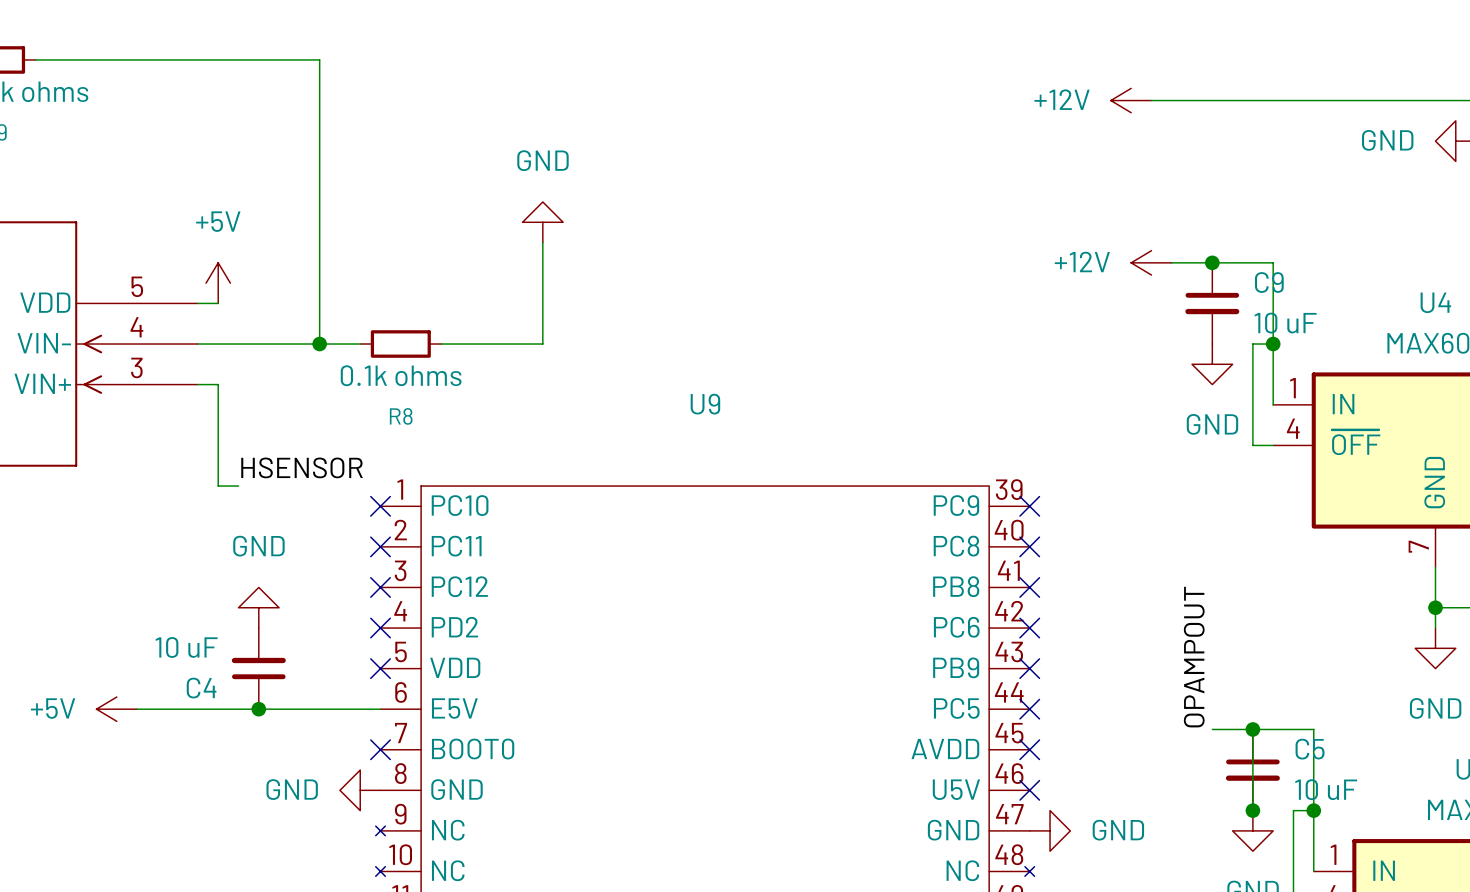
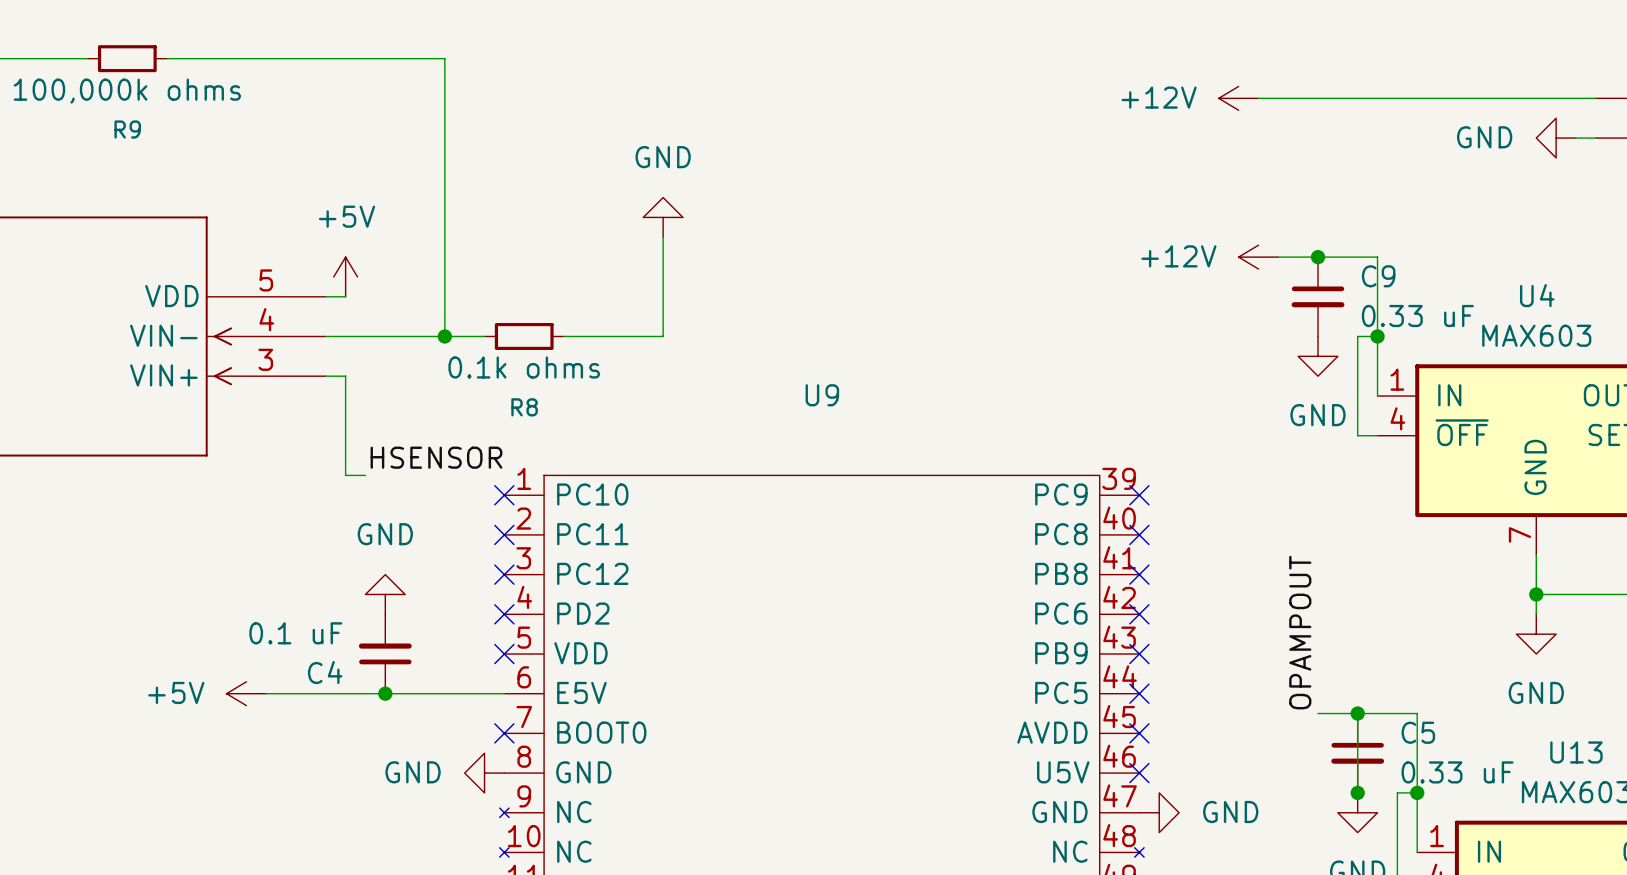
C9 value: 10 uF (1285, 323) -> 0.33 uF (1417, 316)
C4 value: 10 uF (186, 647) -> 0.1 uF (295, 633)
C5 value: 10 uF (1326, 789) -> 0.33 uF (1457, 772)

